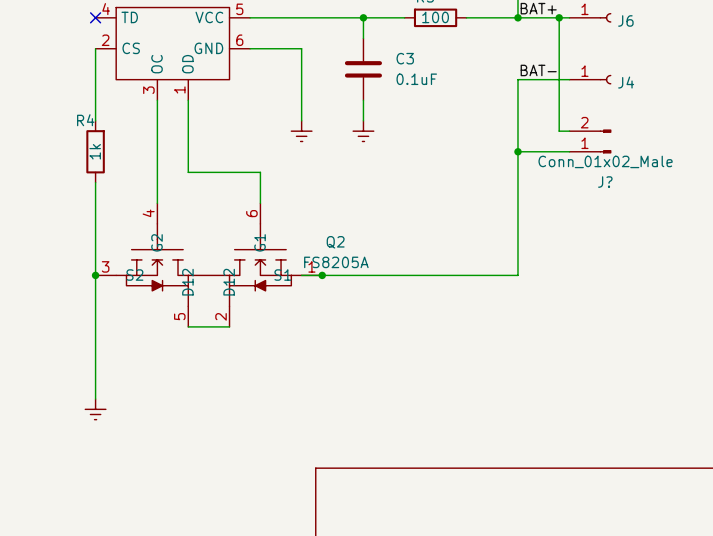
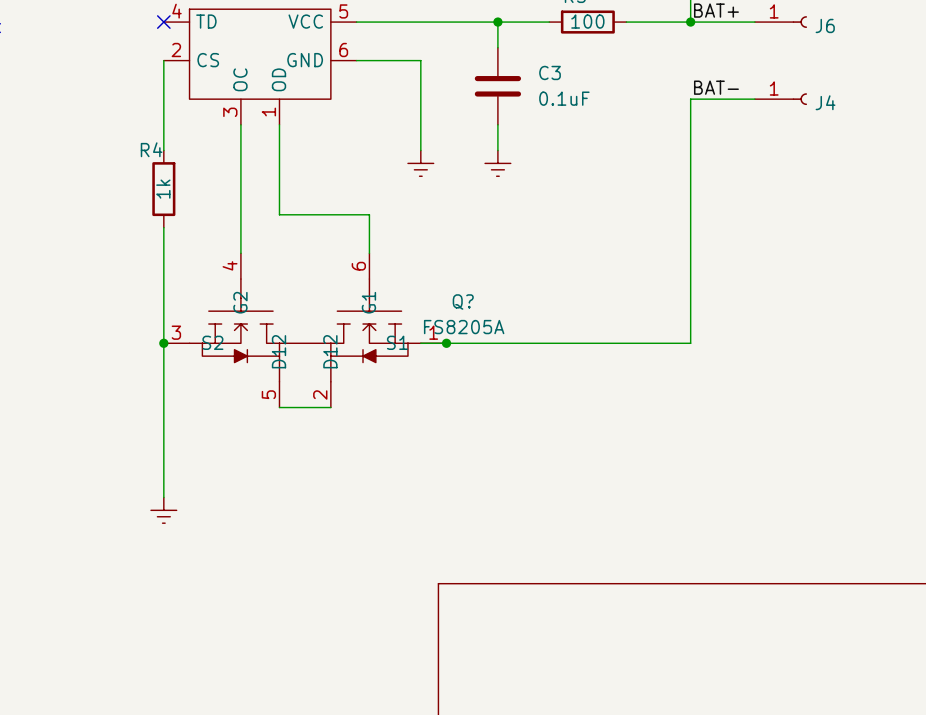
wire: (559, 17) (559, 131) (569, 131) -> none
junction: (559, 17) -> none
J?: Conn_01x02_Male (590, 141) -> none
wire: (517, 151) (569, 151) -> none
junction: (517, 151) -> none
Q2 name: Q2 (335, 242) -> Q? (463, 302)

